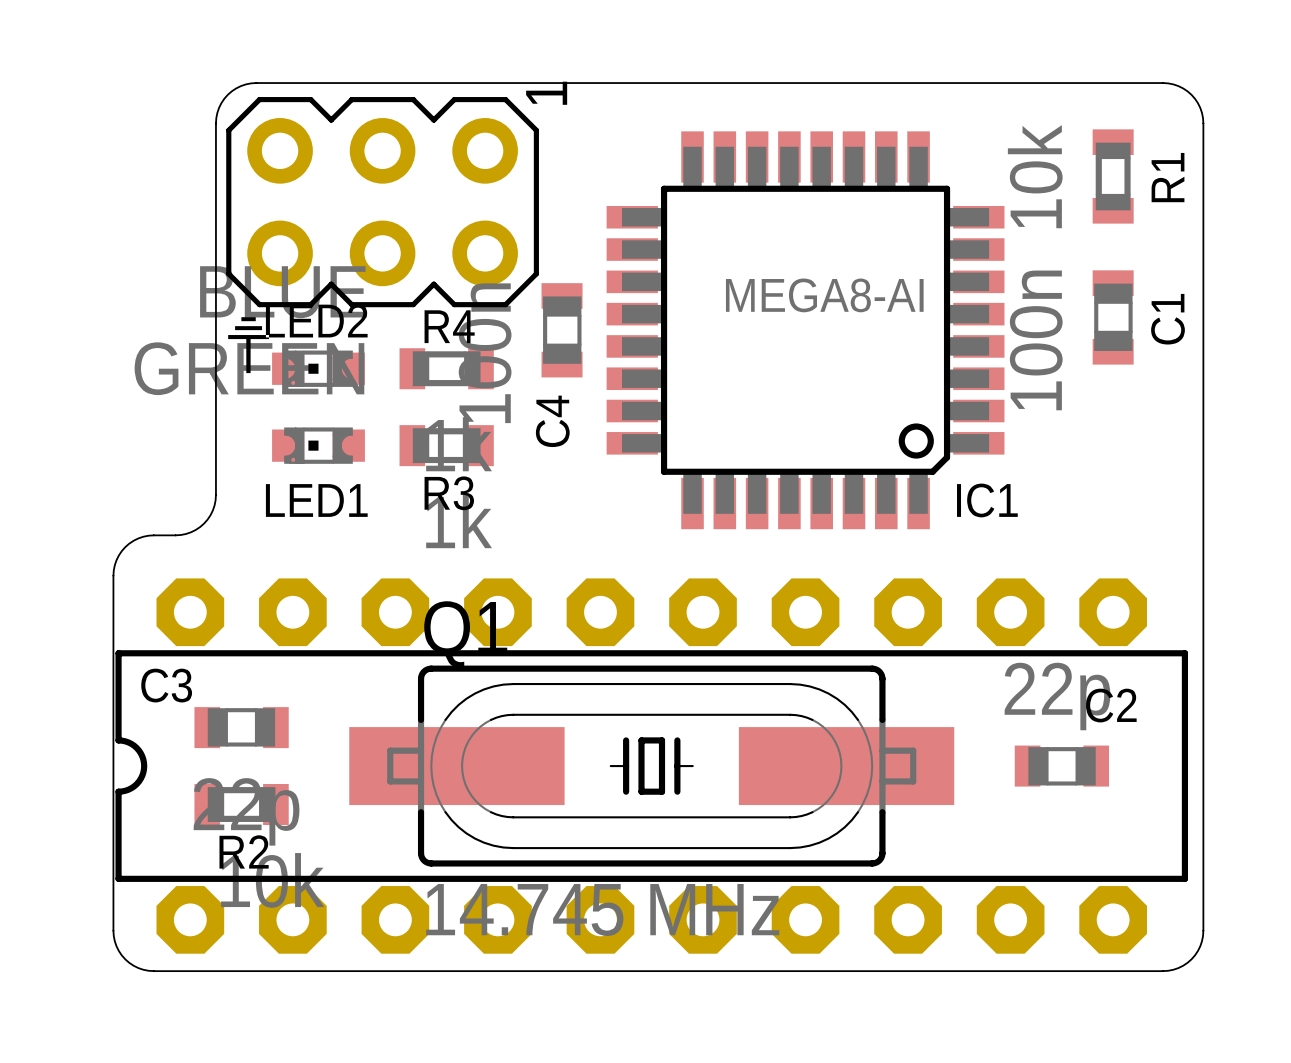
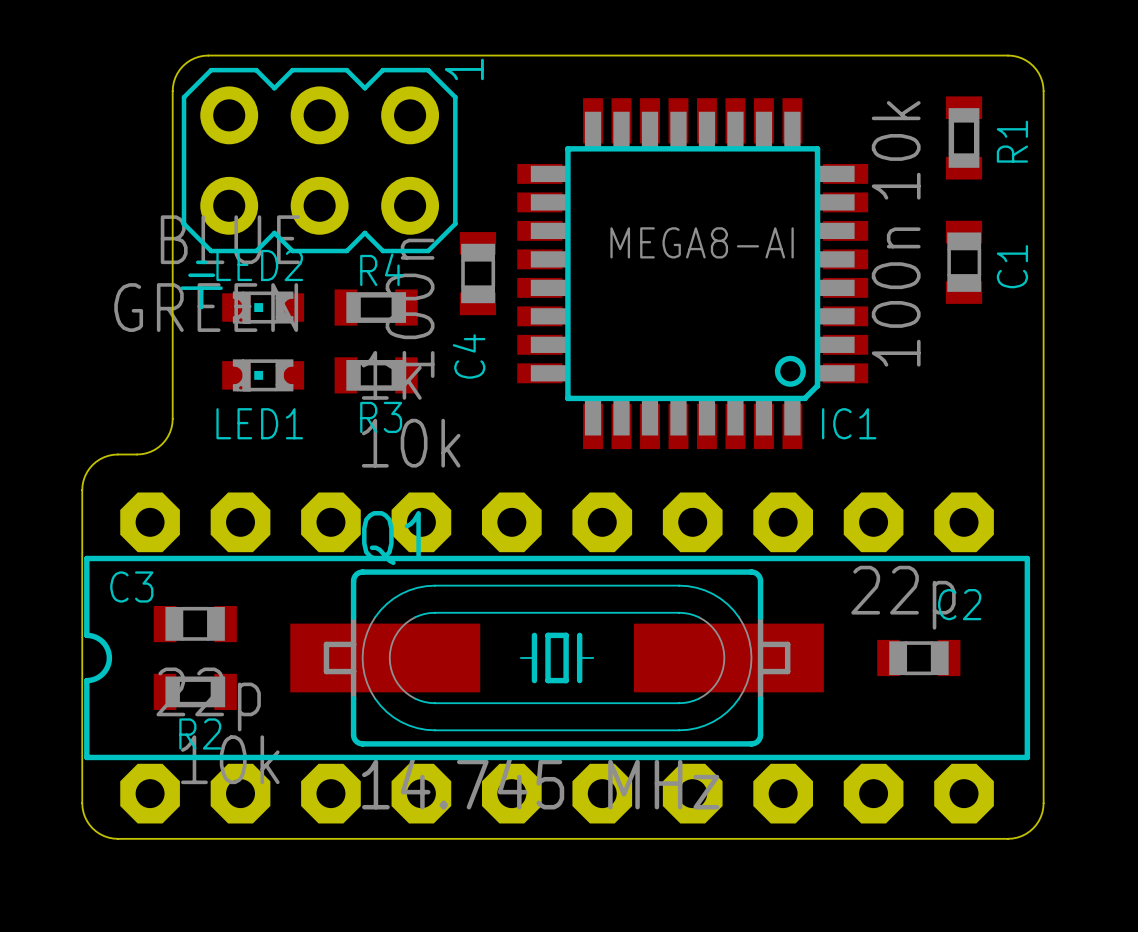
R3 value: 1k (459, 521) -> 10k (411, 443)

